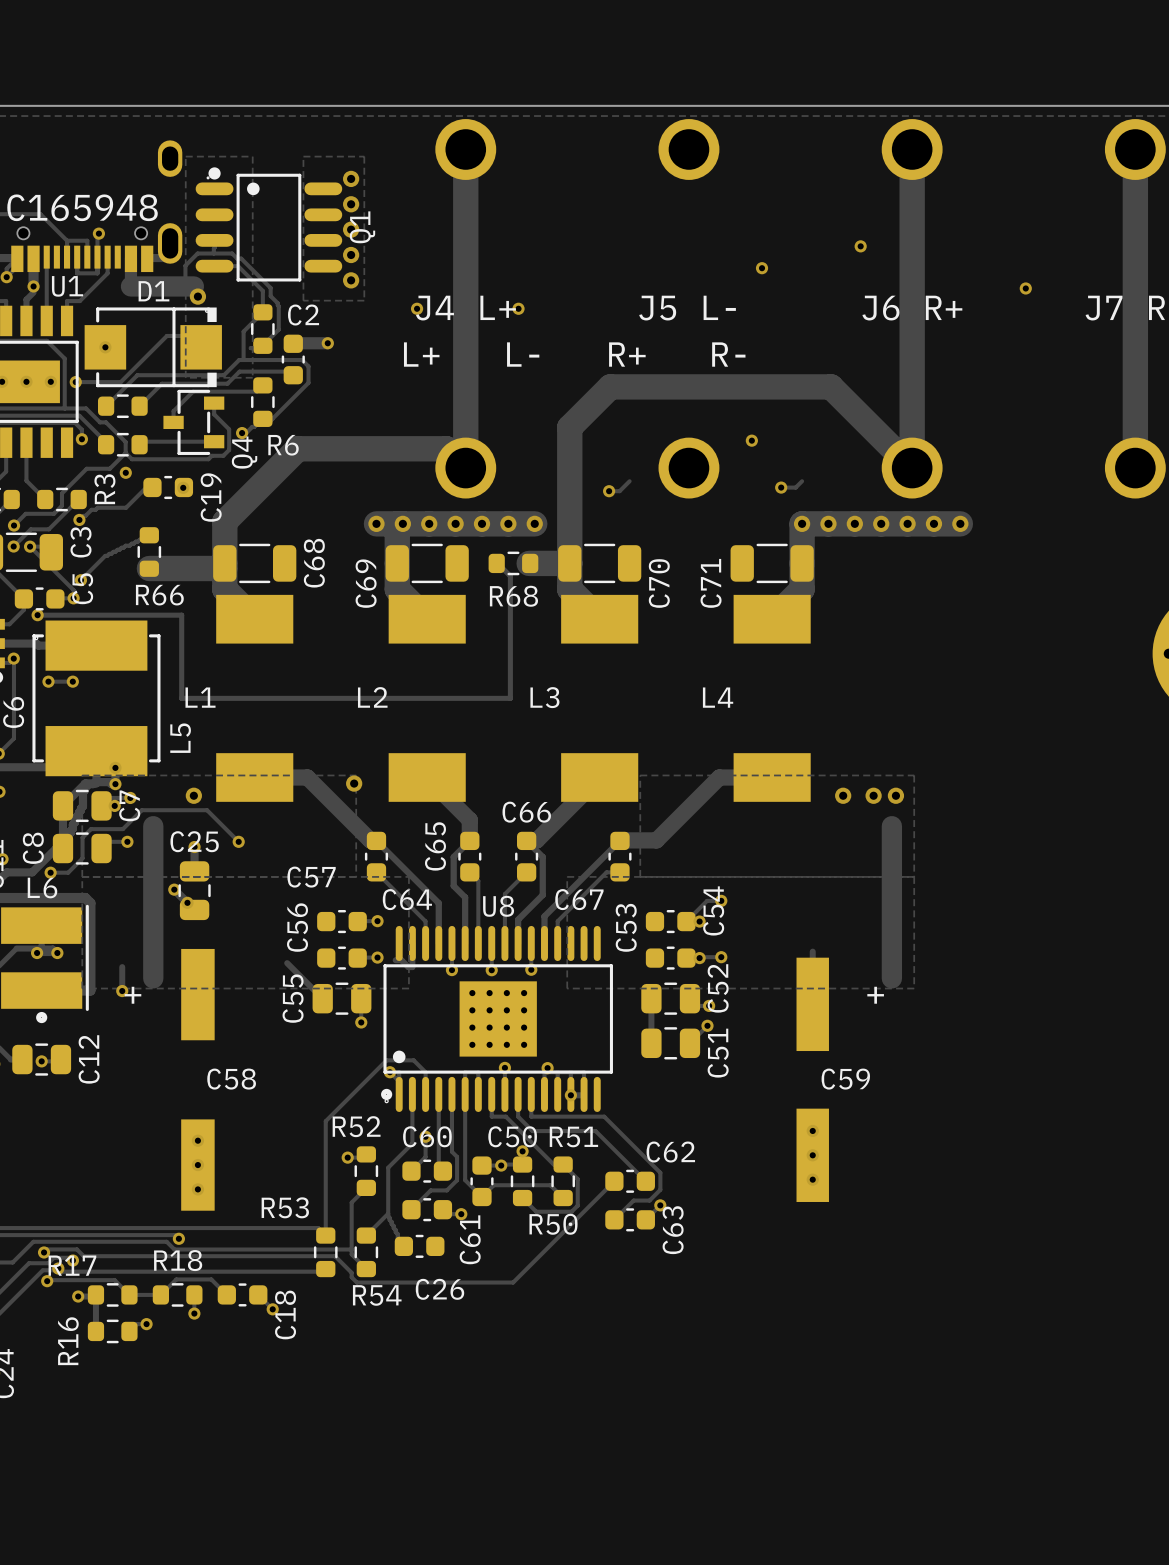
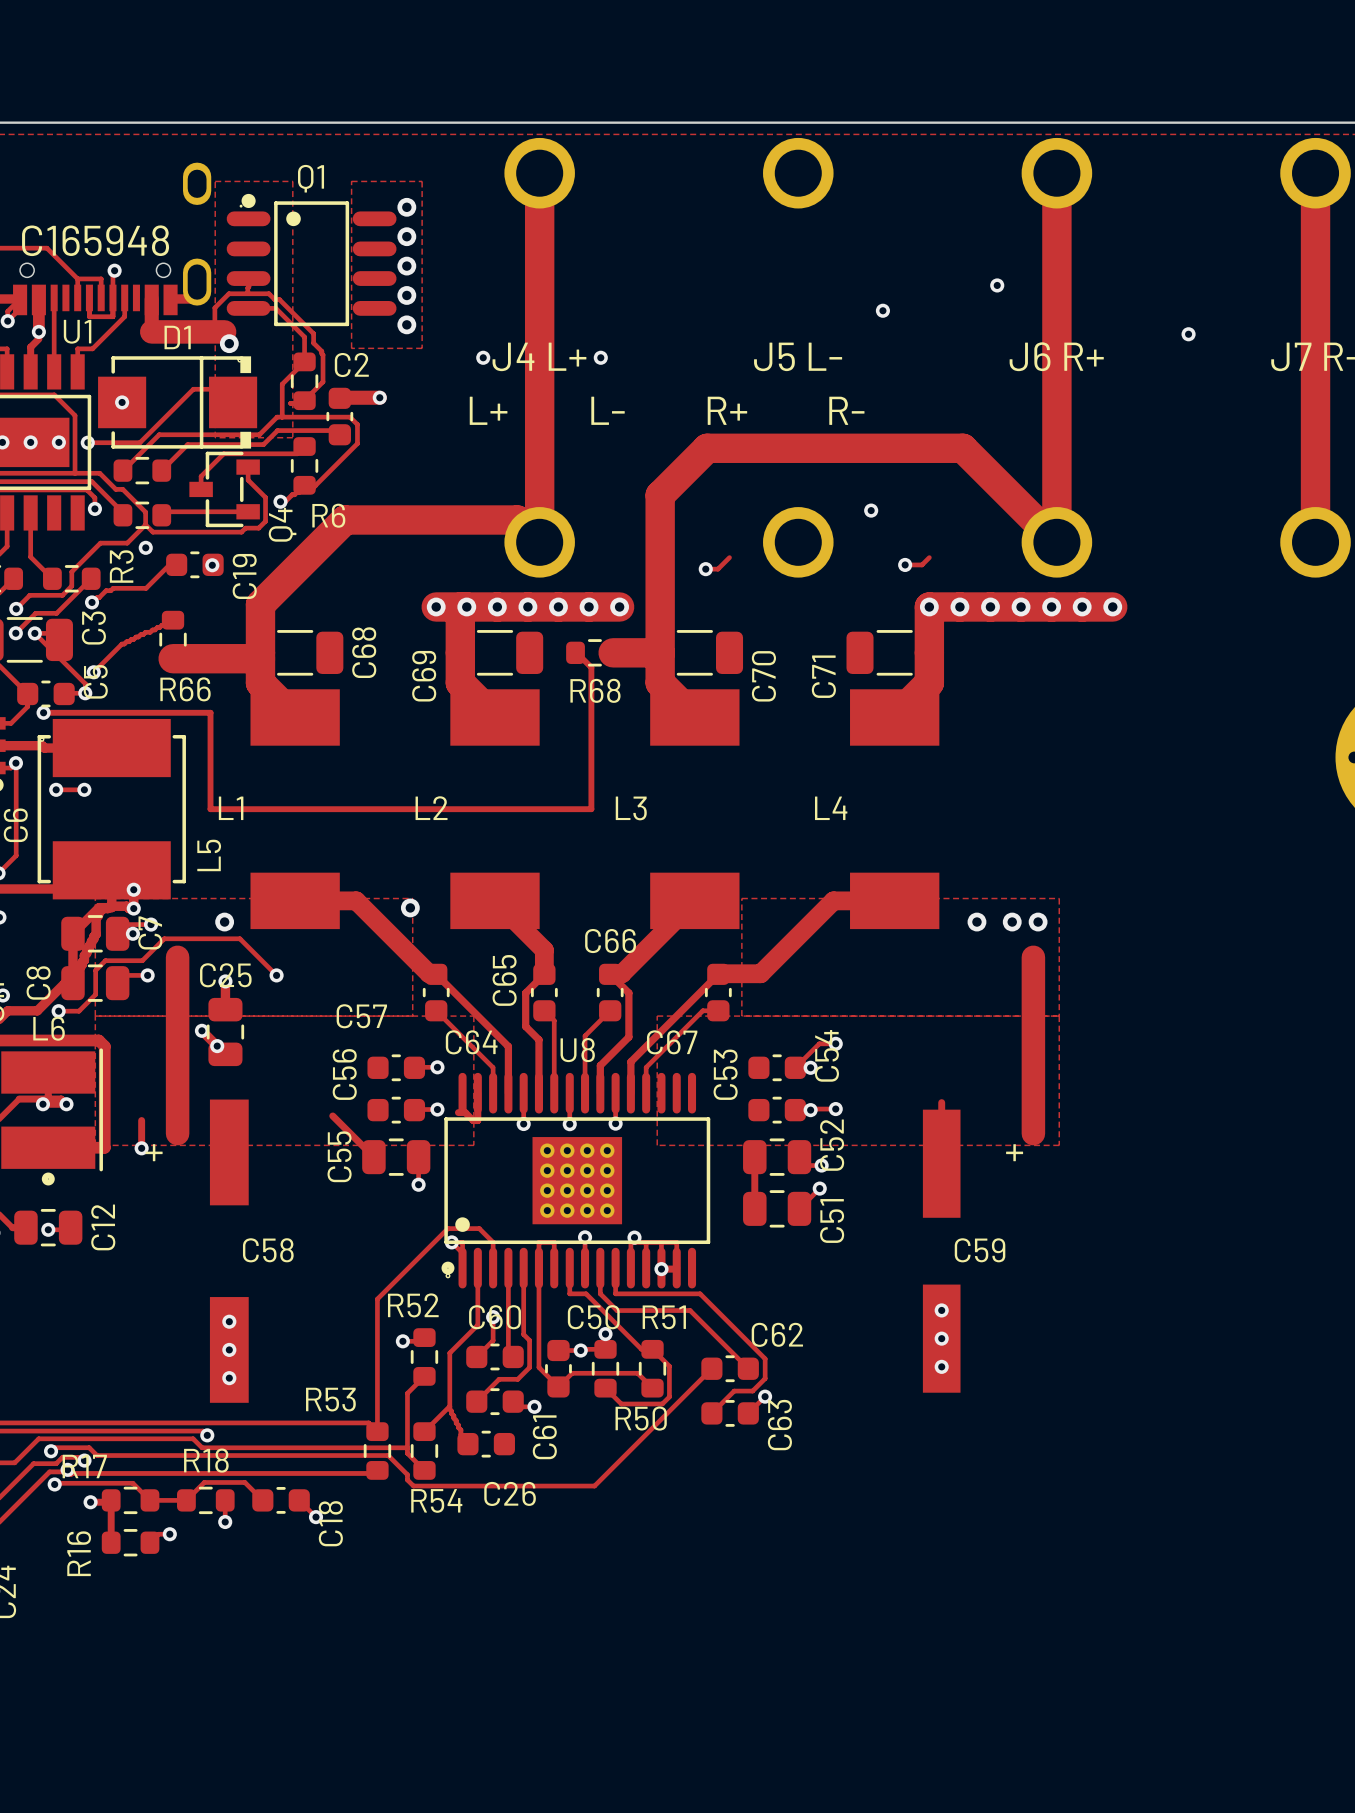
Q1 name rotation: 0° (362, 227) -> 90° clockwise (311, 178)
Q1 name position: Q1 (362, 227) -> Q1 (311, 178)

